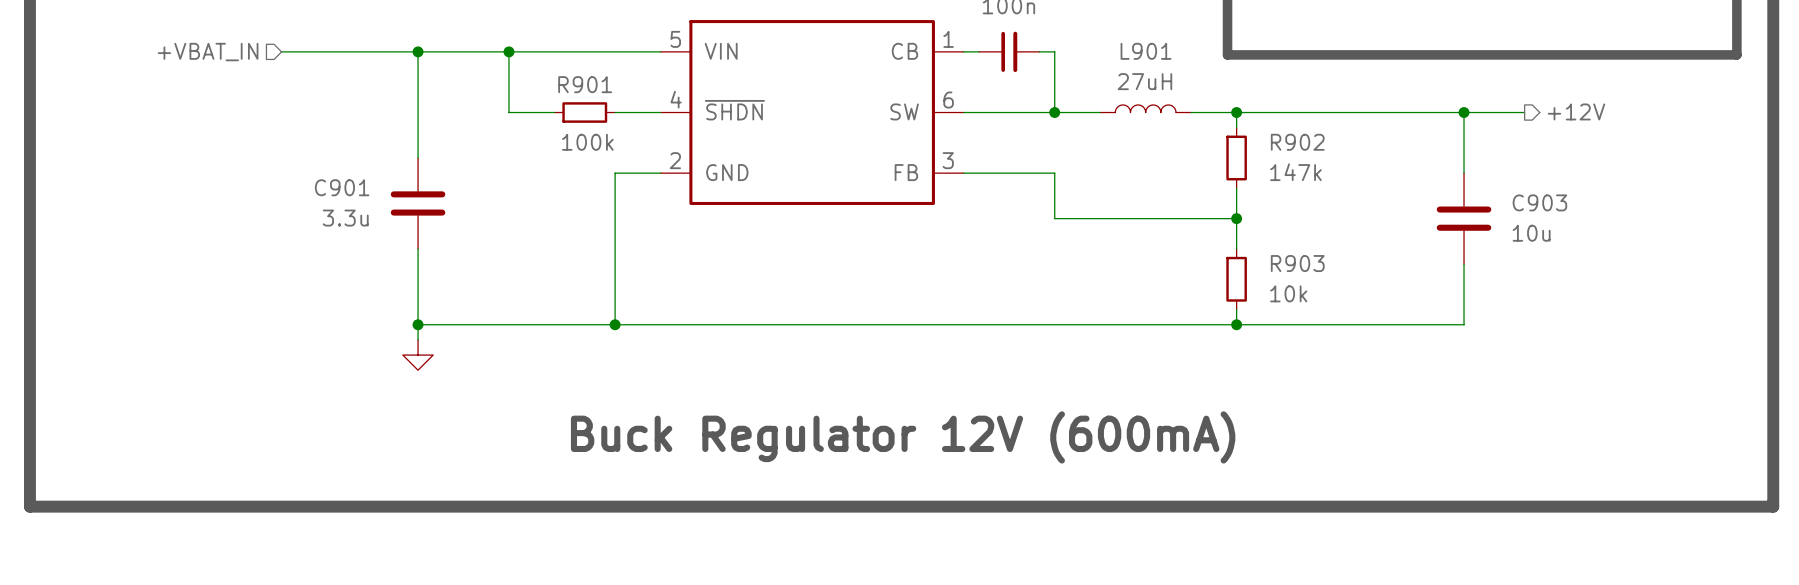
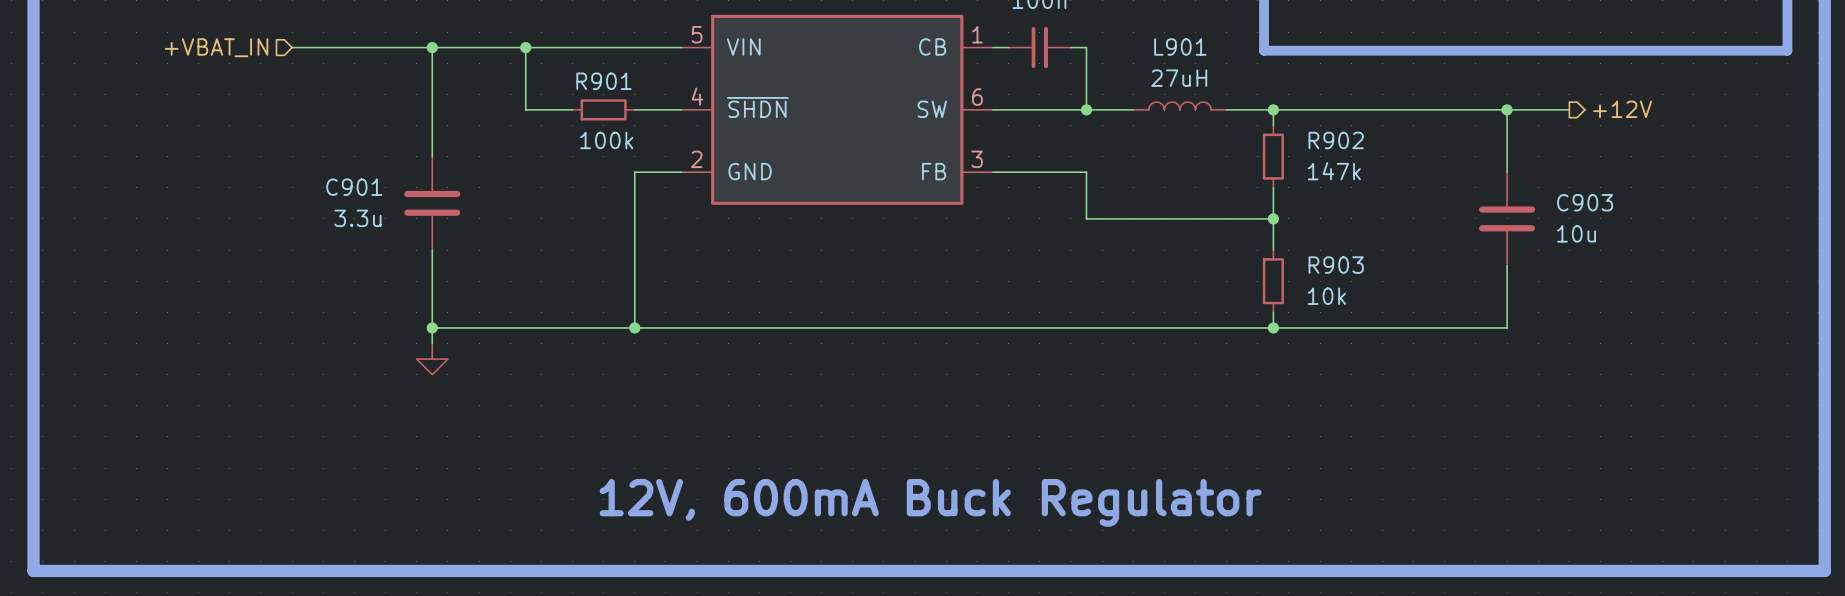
text: Buck Regulator 12V (600mA) (903, 437) -> none
text: none -> 12V, 600mA Buck Regulator (930, 502)
line: (29, 506) (1773, 506) -> (33, 514) (33, 570) (1824, 570) (1824, 514)

